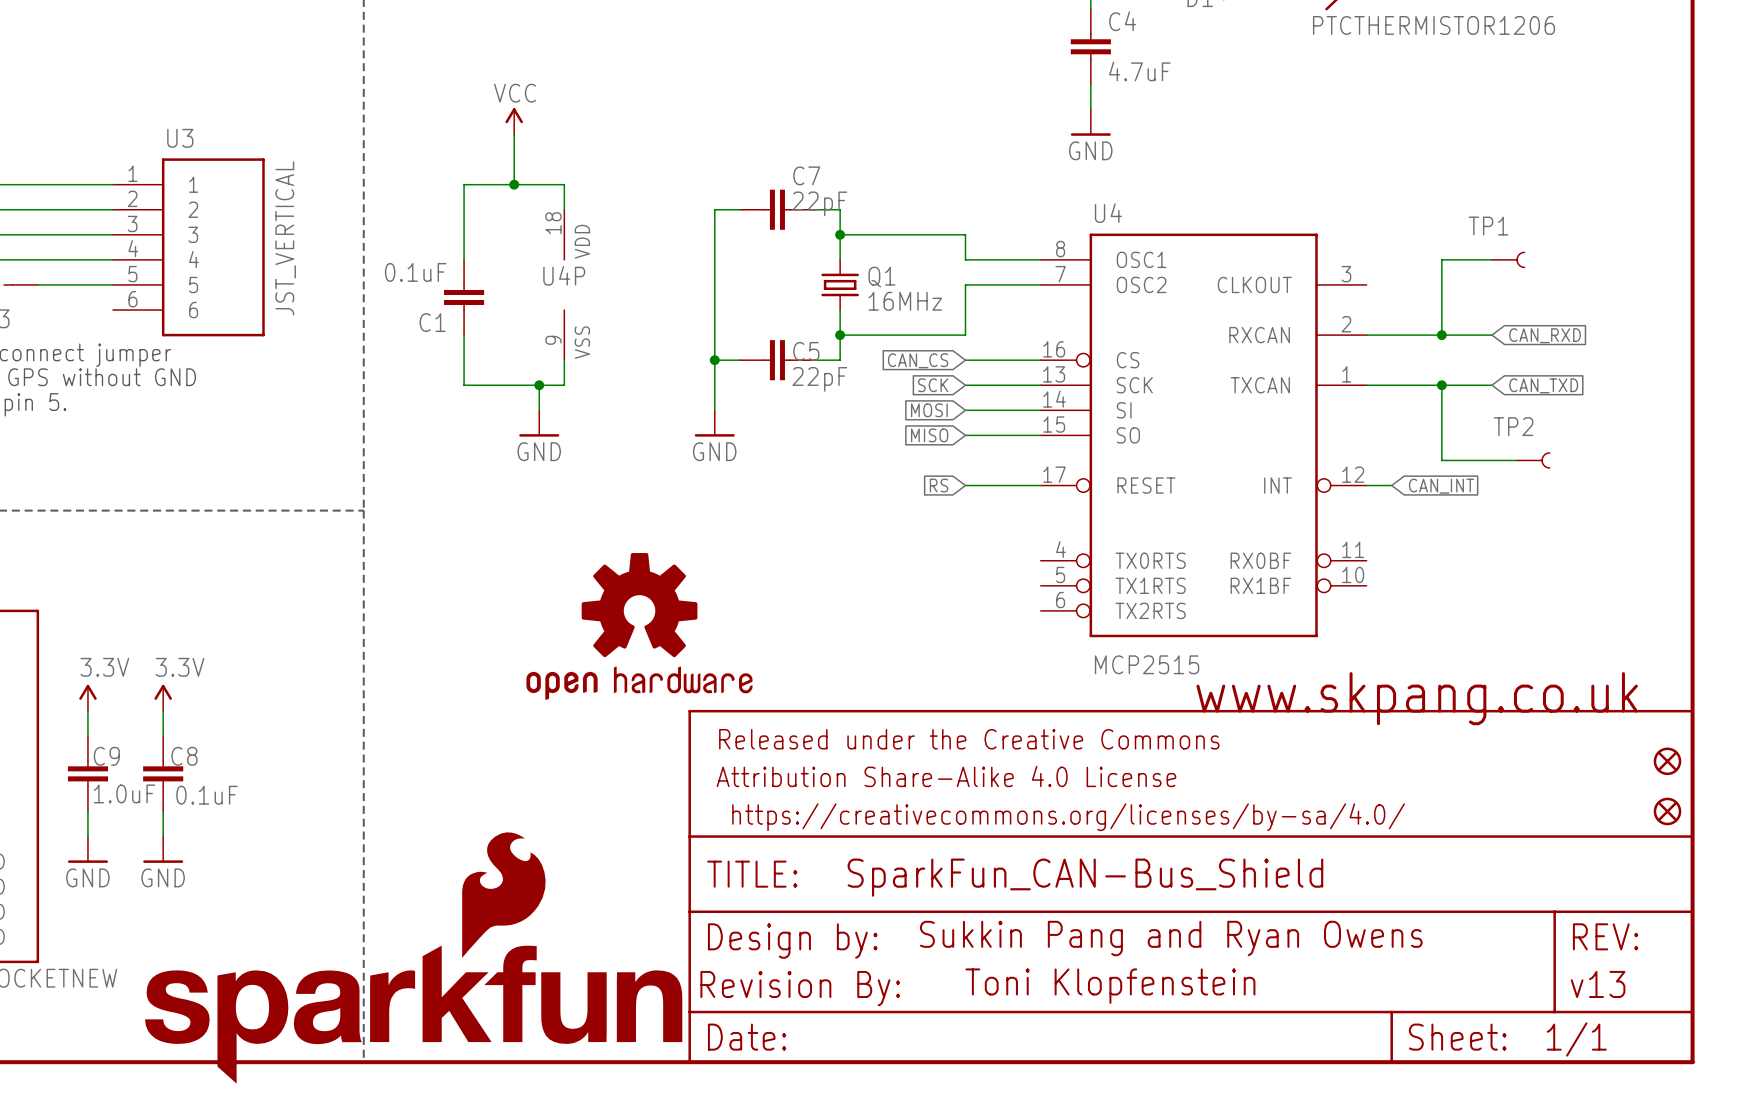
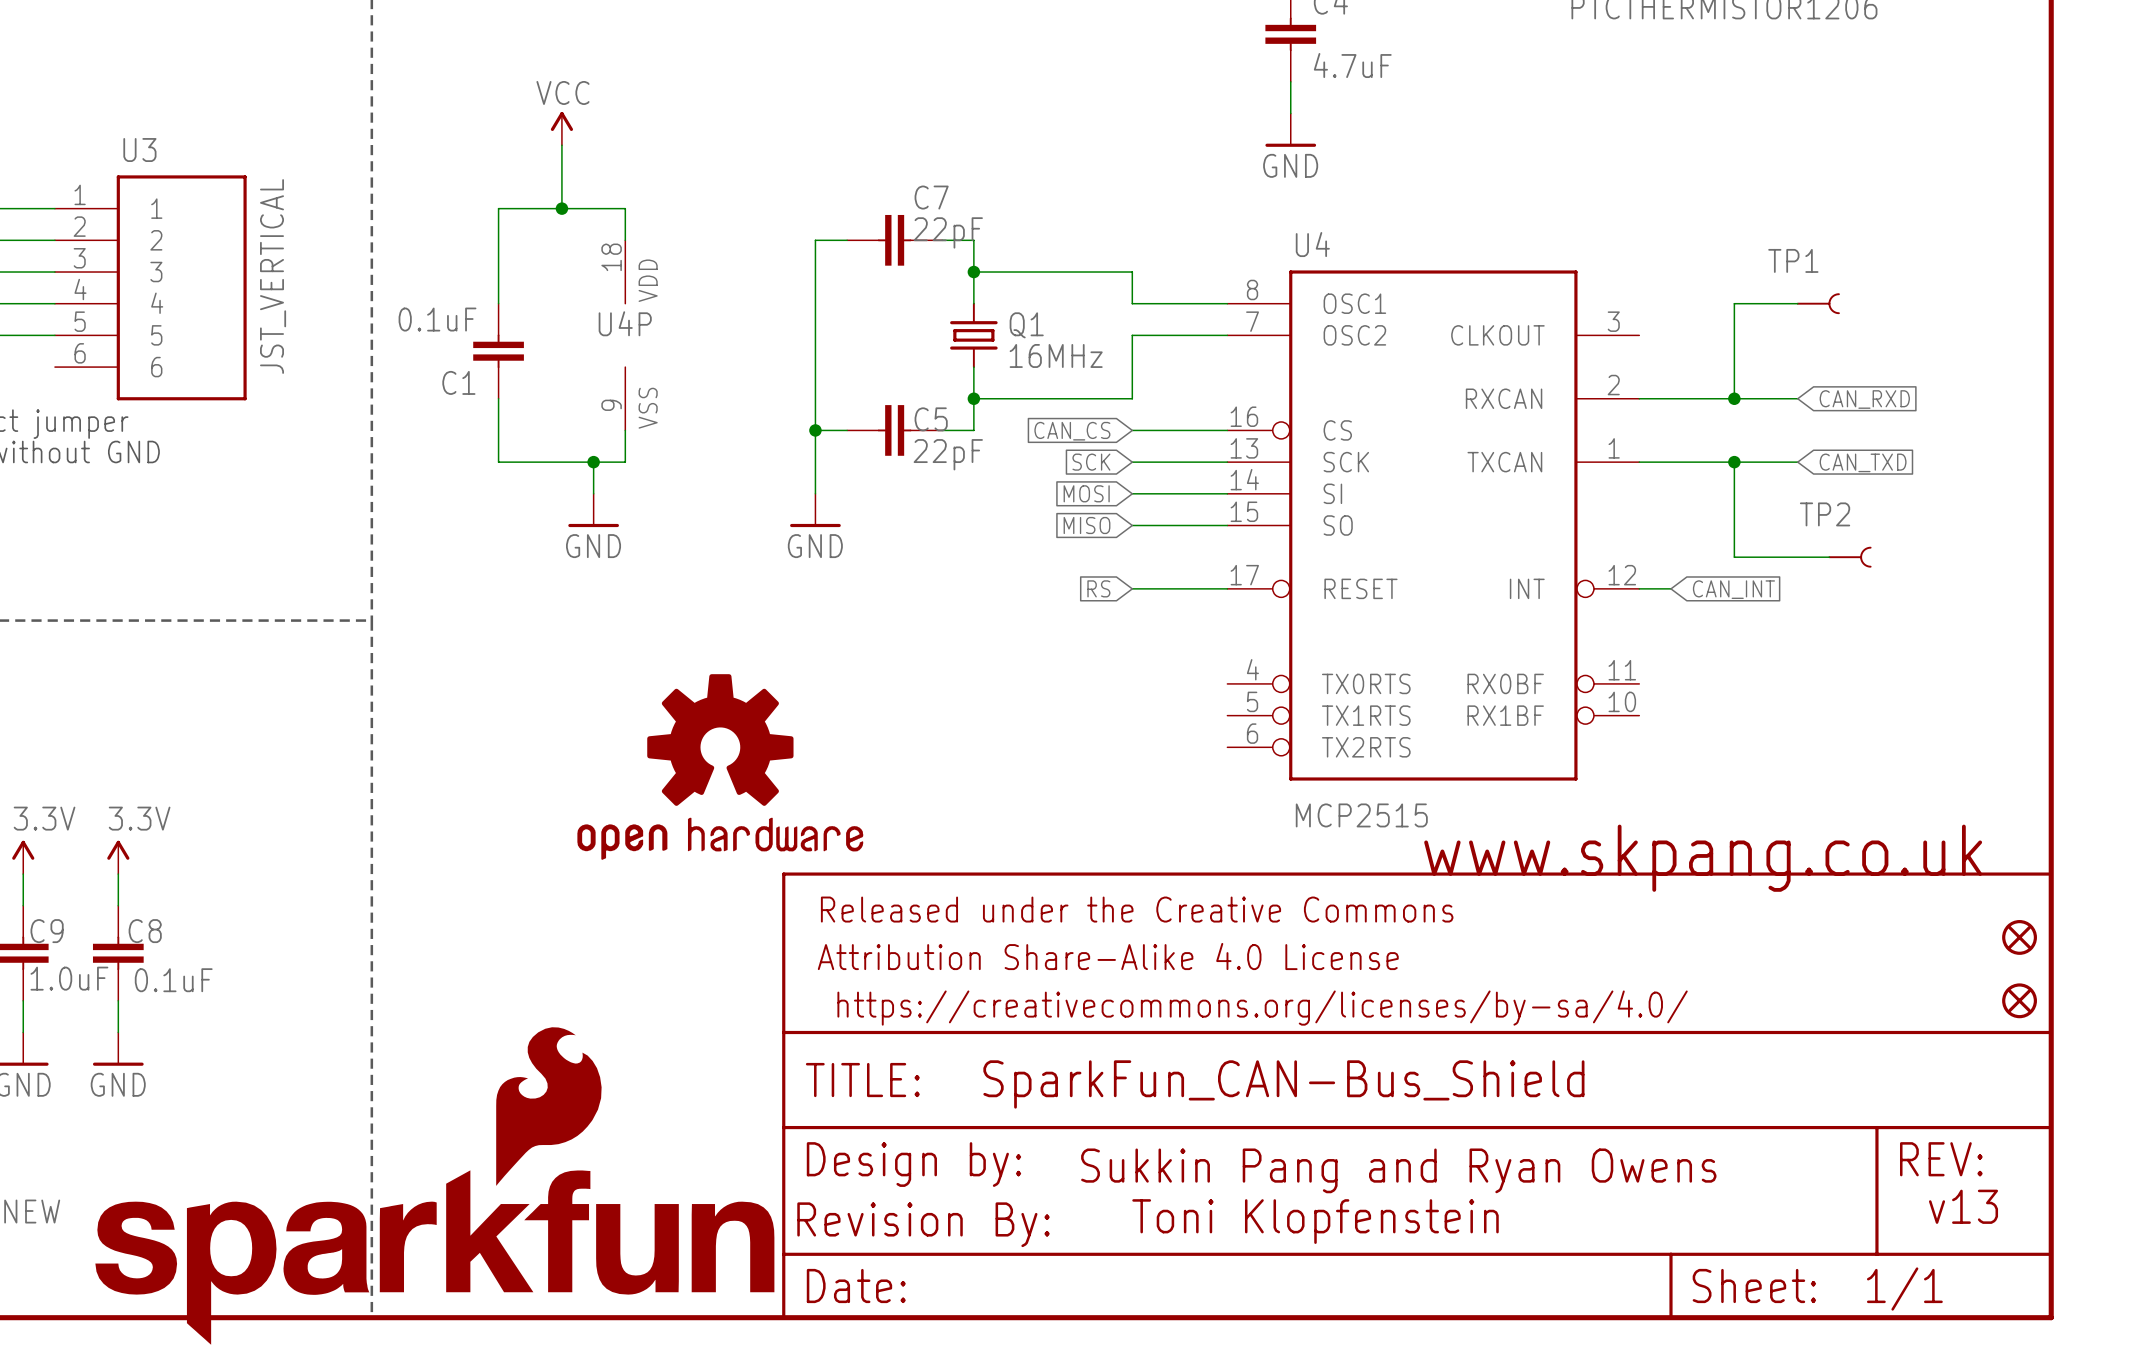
part text: Sukkin Pang and Ryan Owens (1171, 938) -> none
text: none -> Sukkin Pang and Ryan Owens (1398, 1170)
text: none -> v13 (1963, 1206)
part text: v13 (1598, 984) -> none

